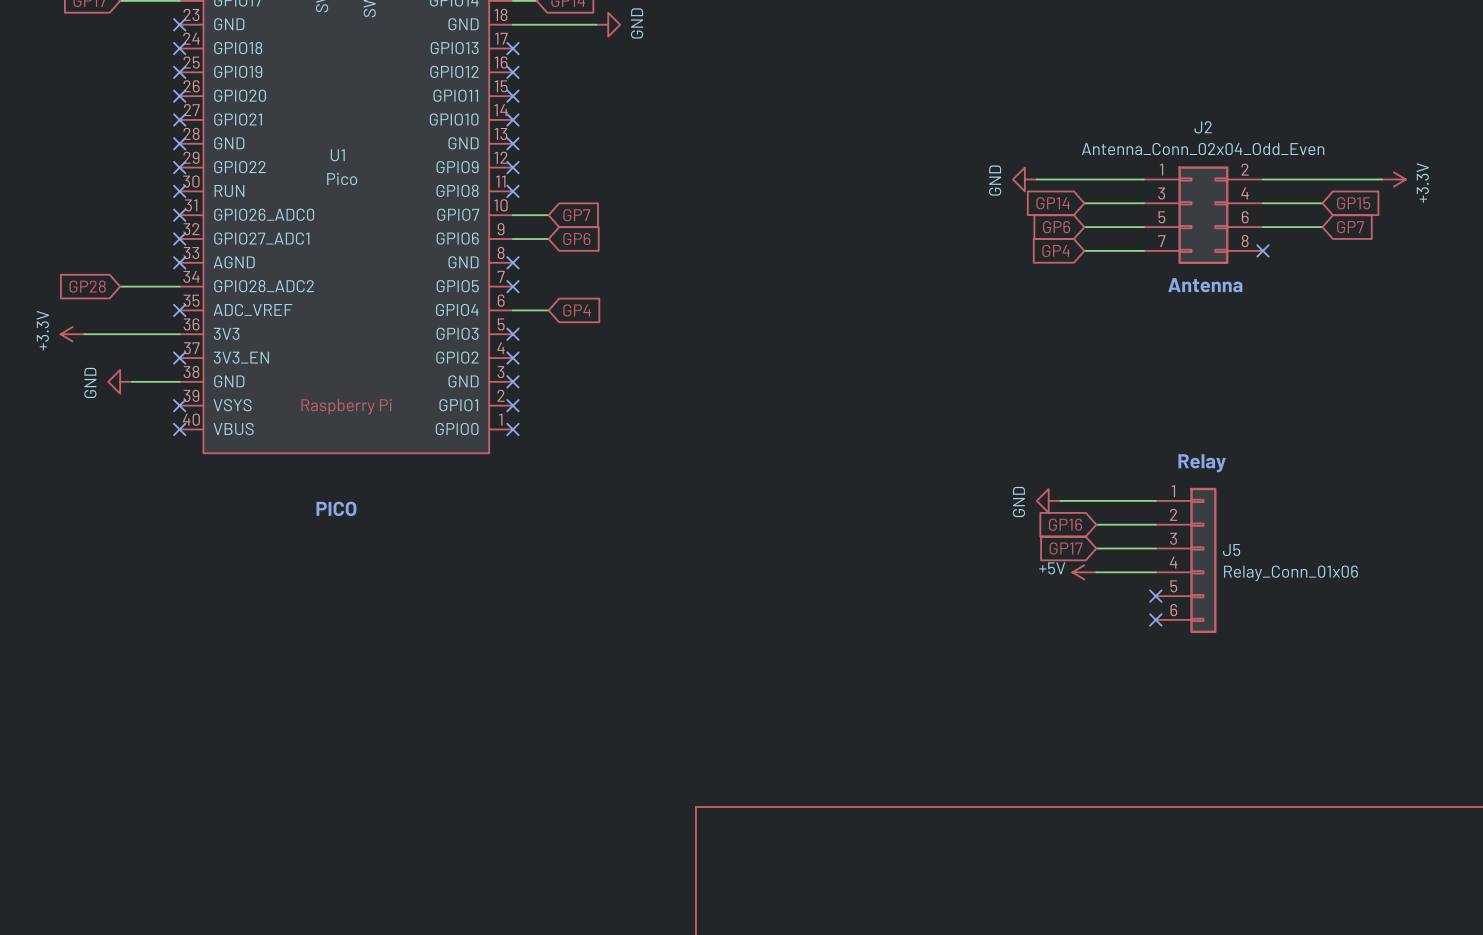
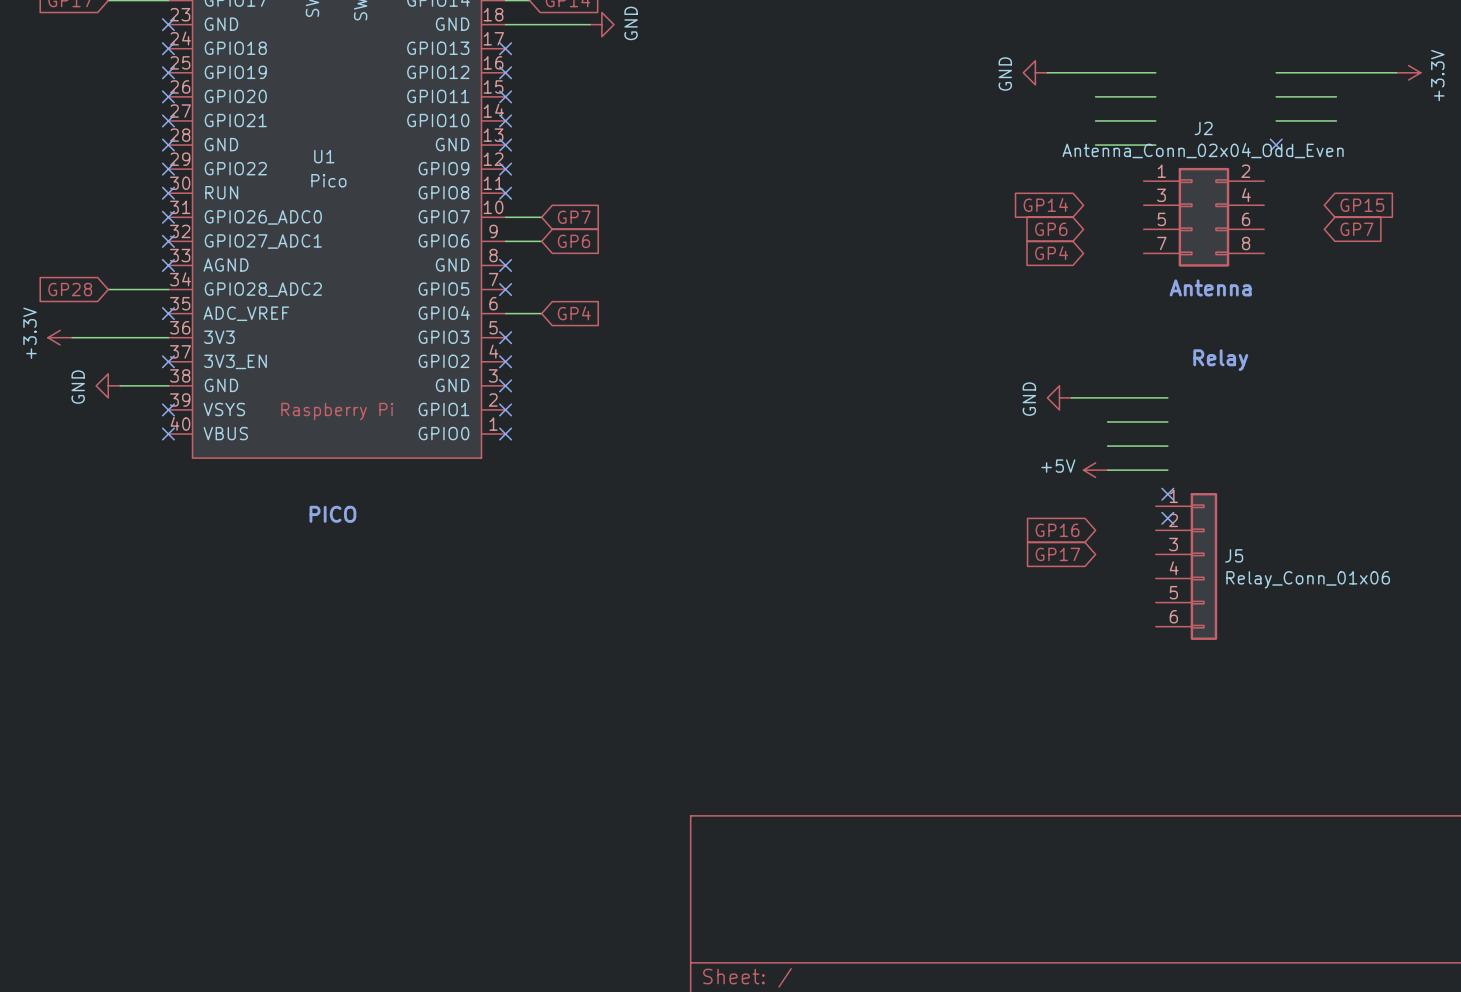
no-connect mark: none -> (1276, 145)
power symbol position: GND (1024, 179) -> GND (1035, 72)
wire: (1036, 179) (1143, 179) -> (1047, 72) (1155, 72)
wire: (1262, 179) (1382, 179) -> (1276, 72) (1396, 72)
power symbol position: +3.3V (1393, 179) -> +3.3V (1408, 72)
wire: (1084, 203) (1143, 203) -> (1095, 96) (1155, 96)
wire: (1262, 203) (1322, 203) -> (1276, 96) (1336, 96)
wire: (1084, 227) (1143, 227) -> (1095, 120) (1155, 120)
wire: (1262, 227) (1322, 227) -> (1276, 120) (1336, 120)
wire: (1084, 250) (1143, 250) -> (1095, 145) (1155, 145)
no-connect mark: (1262, 250) -> none
text position: Relay (1202, 463) -> Relay (1220, 360)
no-connect mark: none -> (1167, 494)
power symbol position: GND (1048, 500) -> GND (1059, 397)
wire: (1060, 500) (1155, 500) -> (1071, 397) (1167, 397)
no-connect mark: none -> (1167, 518)
wire: (1096, 524) (1155, 524) -> (1107, 421) (1167, 421)
wire: (1096, 548) (1155, 548) -> (1107, 446) (1167, 446)
power symbol position: +5V (1084, 572) -> +5V (1095, 470)
wire: (1096, 572) (1155, 572) -> (1107, 470) (1167, 470)
no-connect mark: (1155, 596) -> none
no-connect mark: (1155, 619) -> none

